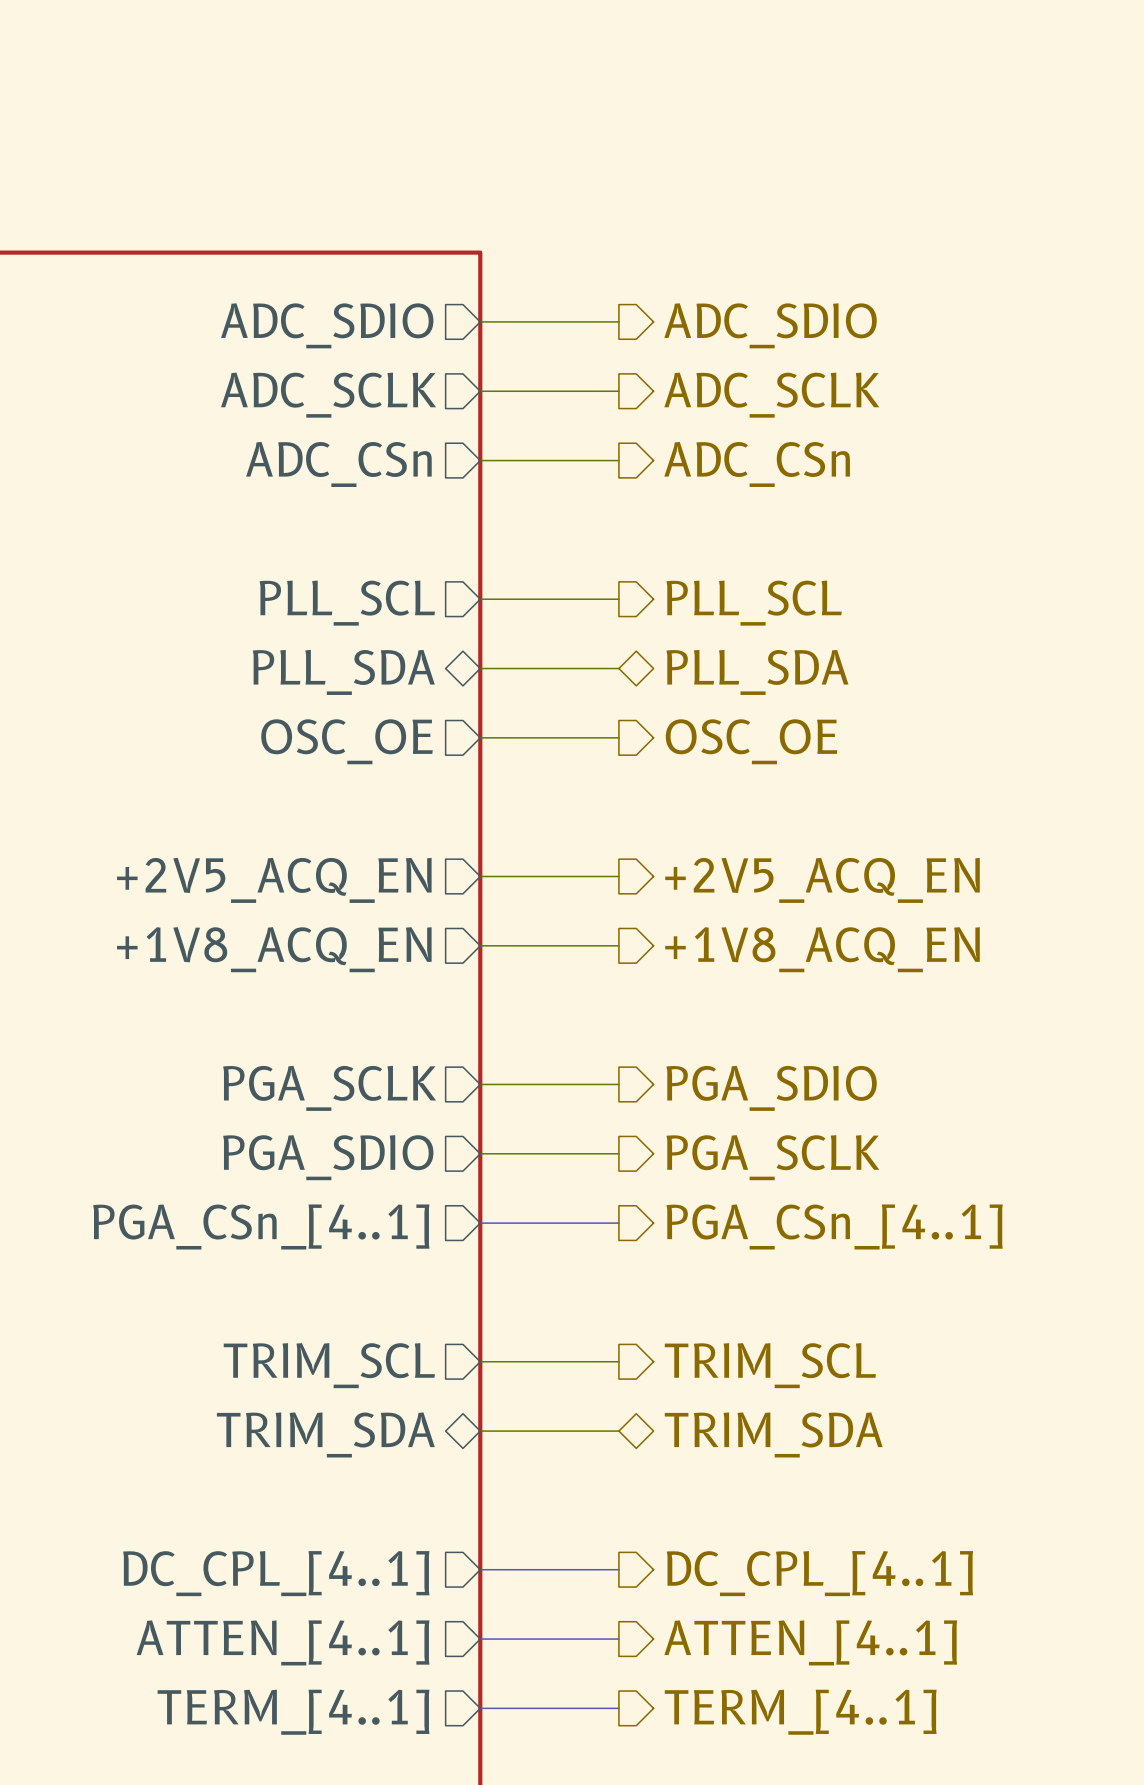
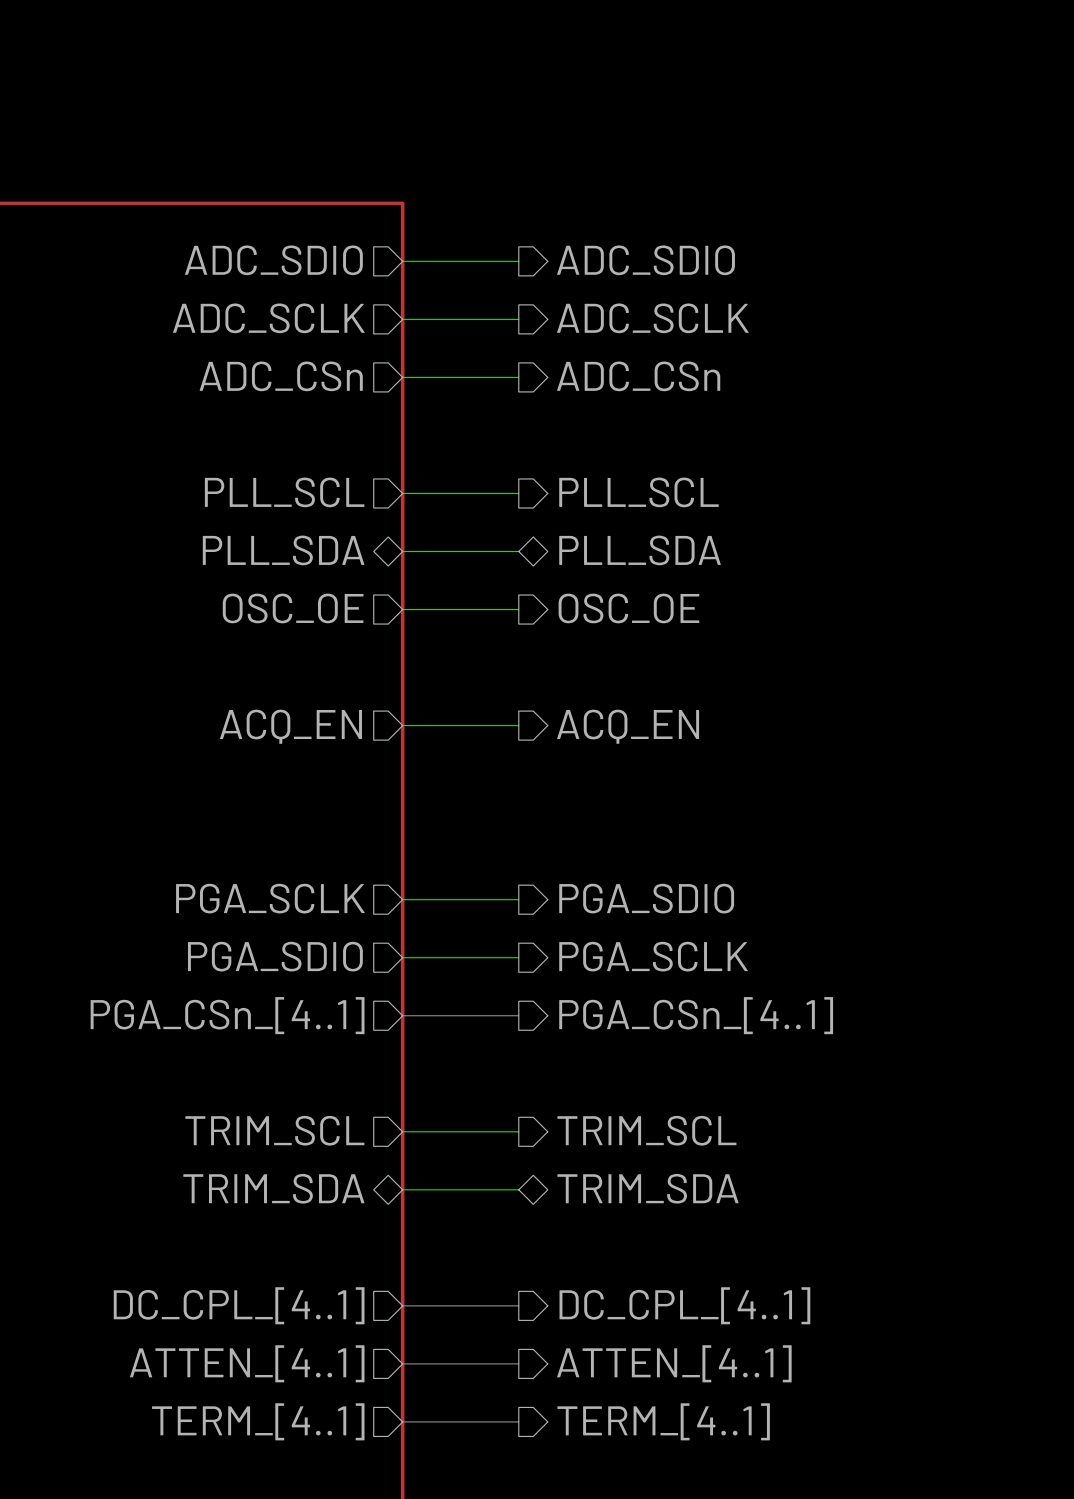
sheet pin: +2V5_ACQ_EN (274, 880) -> ACQ_EN (290, 726)
hierarchical label: +2V5_ACQ_EN (822, 880) -> ACQ_EN (628, 726)
wire: (480, 945) (618, 945) -> none
sheet pin: +1V8_ACQ_EN (274, 949) -> none
hierarchical label: +1V8_ACQ_EN (822, 949) -> none

